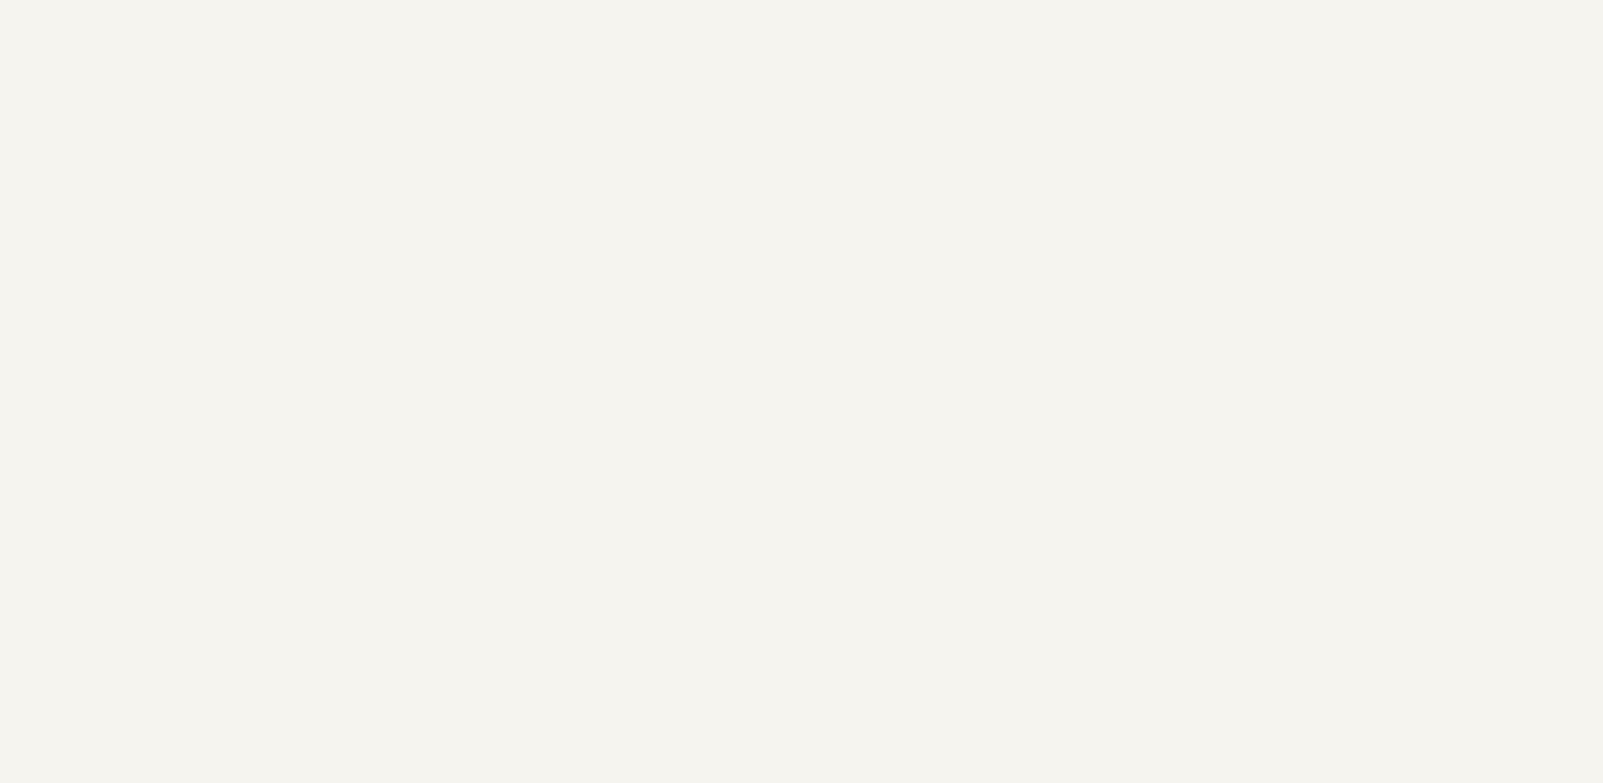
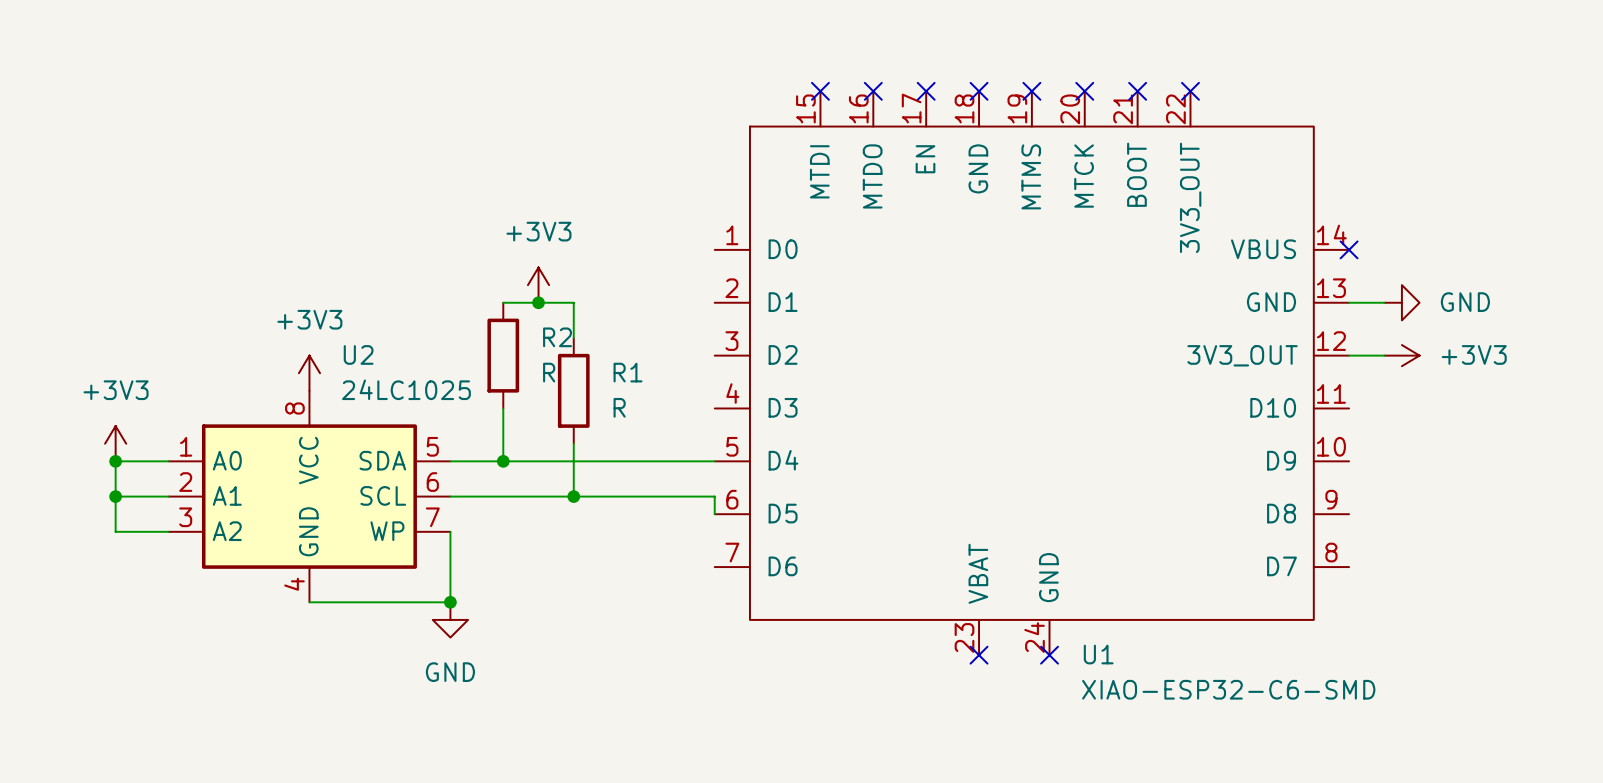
no-connect mark: none -> (820, 91)
no-connect mark: none -> (873, 91)
no-connect mark: none -> (926, 91)
no-connect mark: none -> (979, 91)
no-connect mark: none -> (1031, 91)
no-connect mark: none -> (1084, 91)
no-connect mark: none -> (1137, 91)
no-connect mark: none -> (1190, 91)
no-connect mark: none -> (1349, 249)
power symbol: none -> +3V3 (538, 285)
wire: none -> (503, 302) (573, 302) (573, 338)
junction: none -> (538, 302)
wire: none -> (1349, 302) (1384, 302)
power symbol: none -> GND (1401, 302)
R2: none -> R (503, 355)
wire: none -> (1349, 355) (1384, 355)
power symbol: none -> +3V3 (1401, 355)
power symbol: none -> +3V3 (309, 373)
U1: none -> XIAO-ESP32-C6-SMD (1031, 373)
R1: none -> R (573, 390)
wire: none -> (503, 408) (503, 461)
power symbol: none -> +3V3 (115, 443)
wire: none -> (573, 443) (573, 496)
junction: none -> (115, 461)
wire: none -> (168, 461) (115, 461) (115, 531) (168, 531)
wire: none -> (450, 461) (714, 461)
junction: none -> (503, 461)
wire: none -> (115, 496) (168, 496)
junction: none -> (115, 496)
U2: none -> 24LC1025 (309, 496)
wire: none -> (450, 496) (714, 496) (714, 514)
junction: none -> (573, 496)
wire: none -> (450, 531) (450, 602) (309, 602)
junction: none -> (450, 602)
power symbol: none -> GND (450, 619)
no-connect mark: none -> (979, 655)
no-connect mark: none -> (1049, 655)

